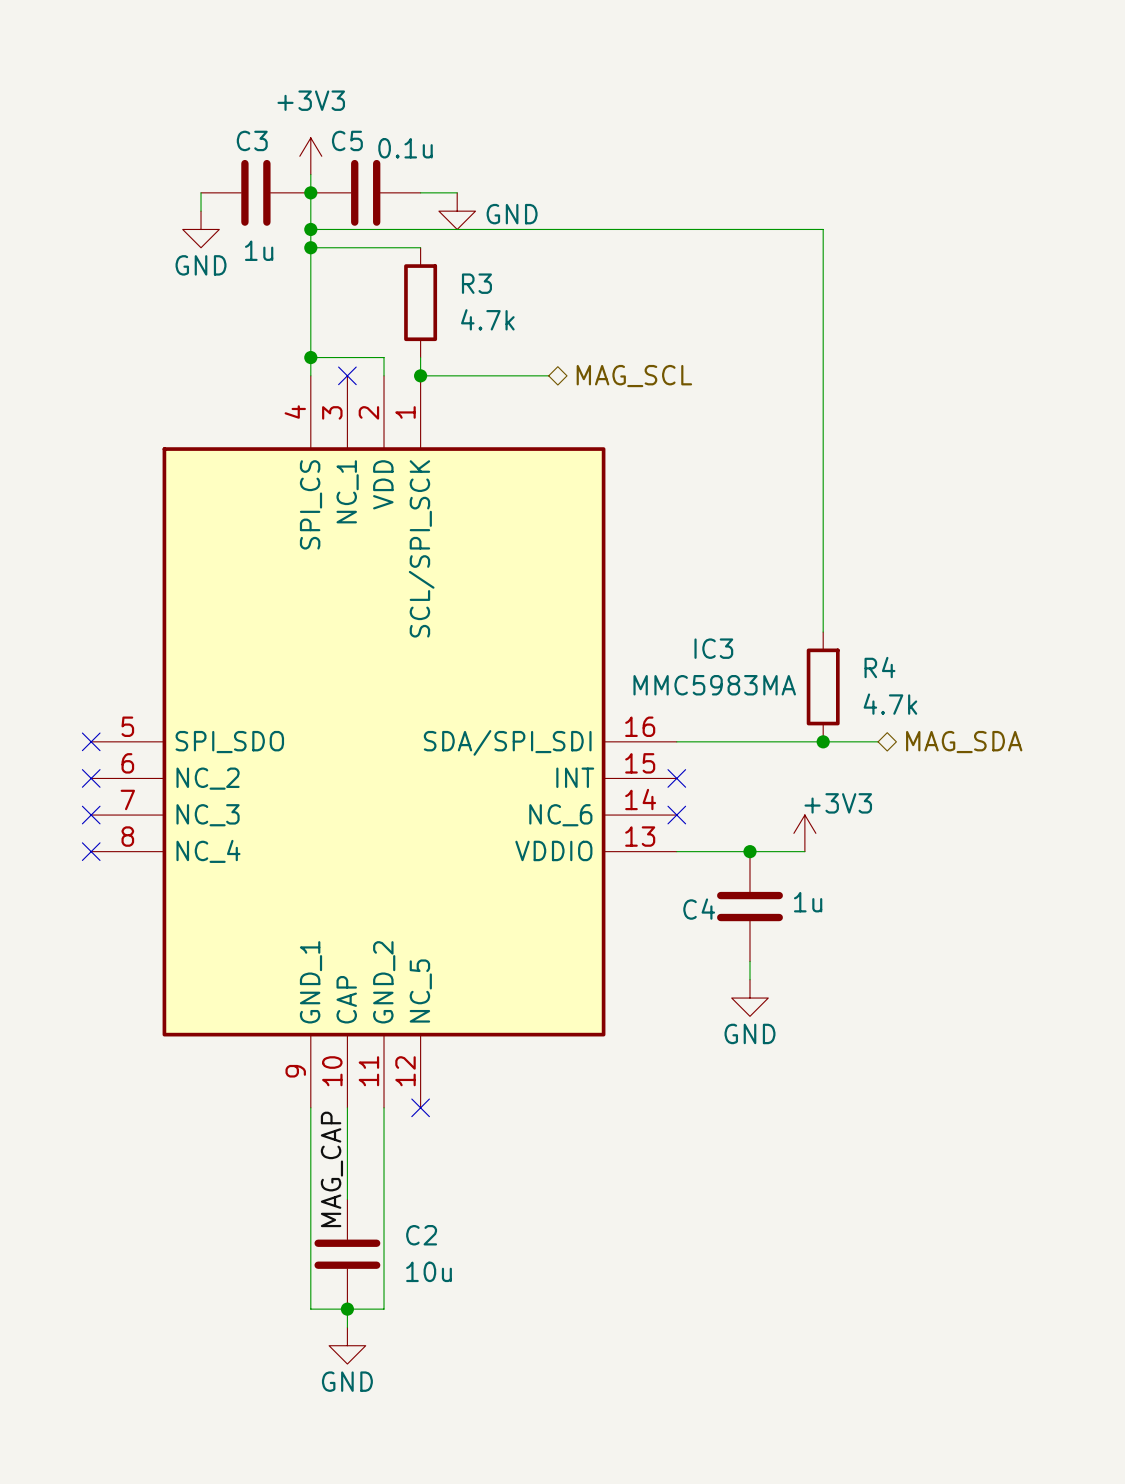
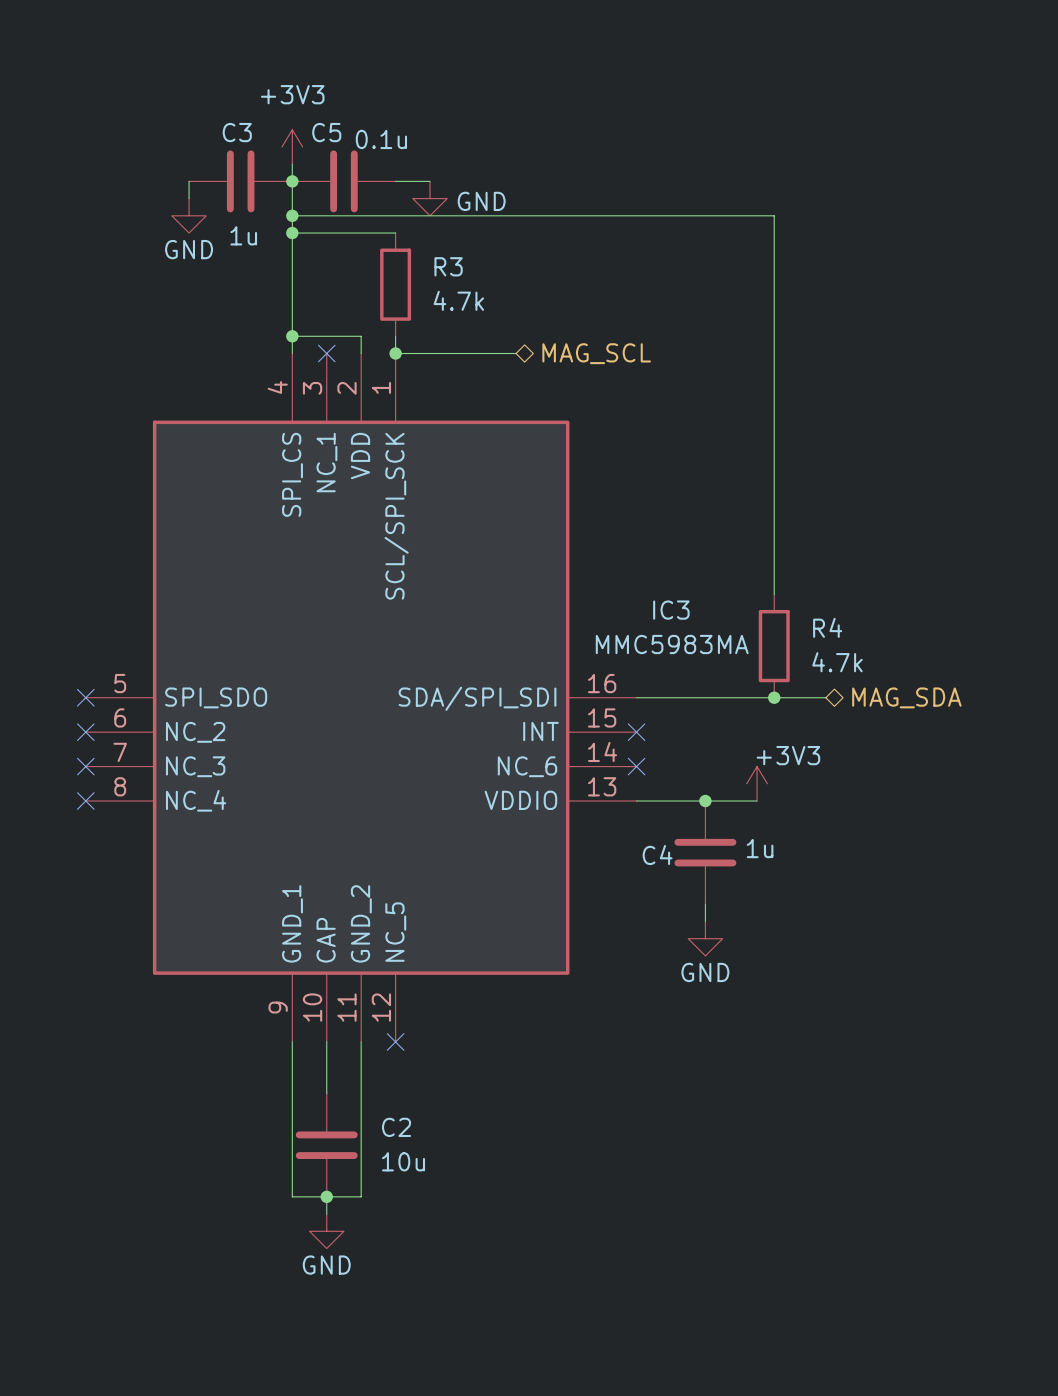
label: MAG_CAP (331, 1169) -> none
C2 position: (347, 1254) -> (326, 1145)
wire: (310, 1272) (310, 1309) (384, 1309) (384, 1272) -> (292, 1196) (361, 1196)
junction position: (347, 1309) -> (326, 1196)
power symbol position: GND (347, 1345) -> GND (326, 1231)

